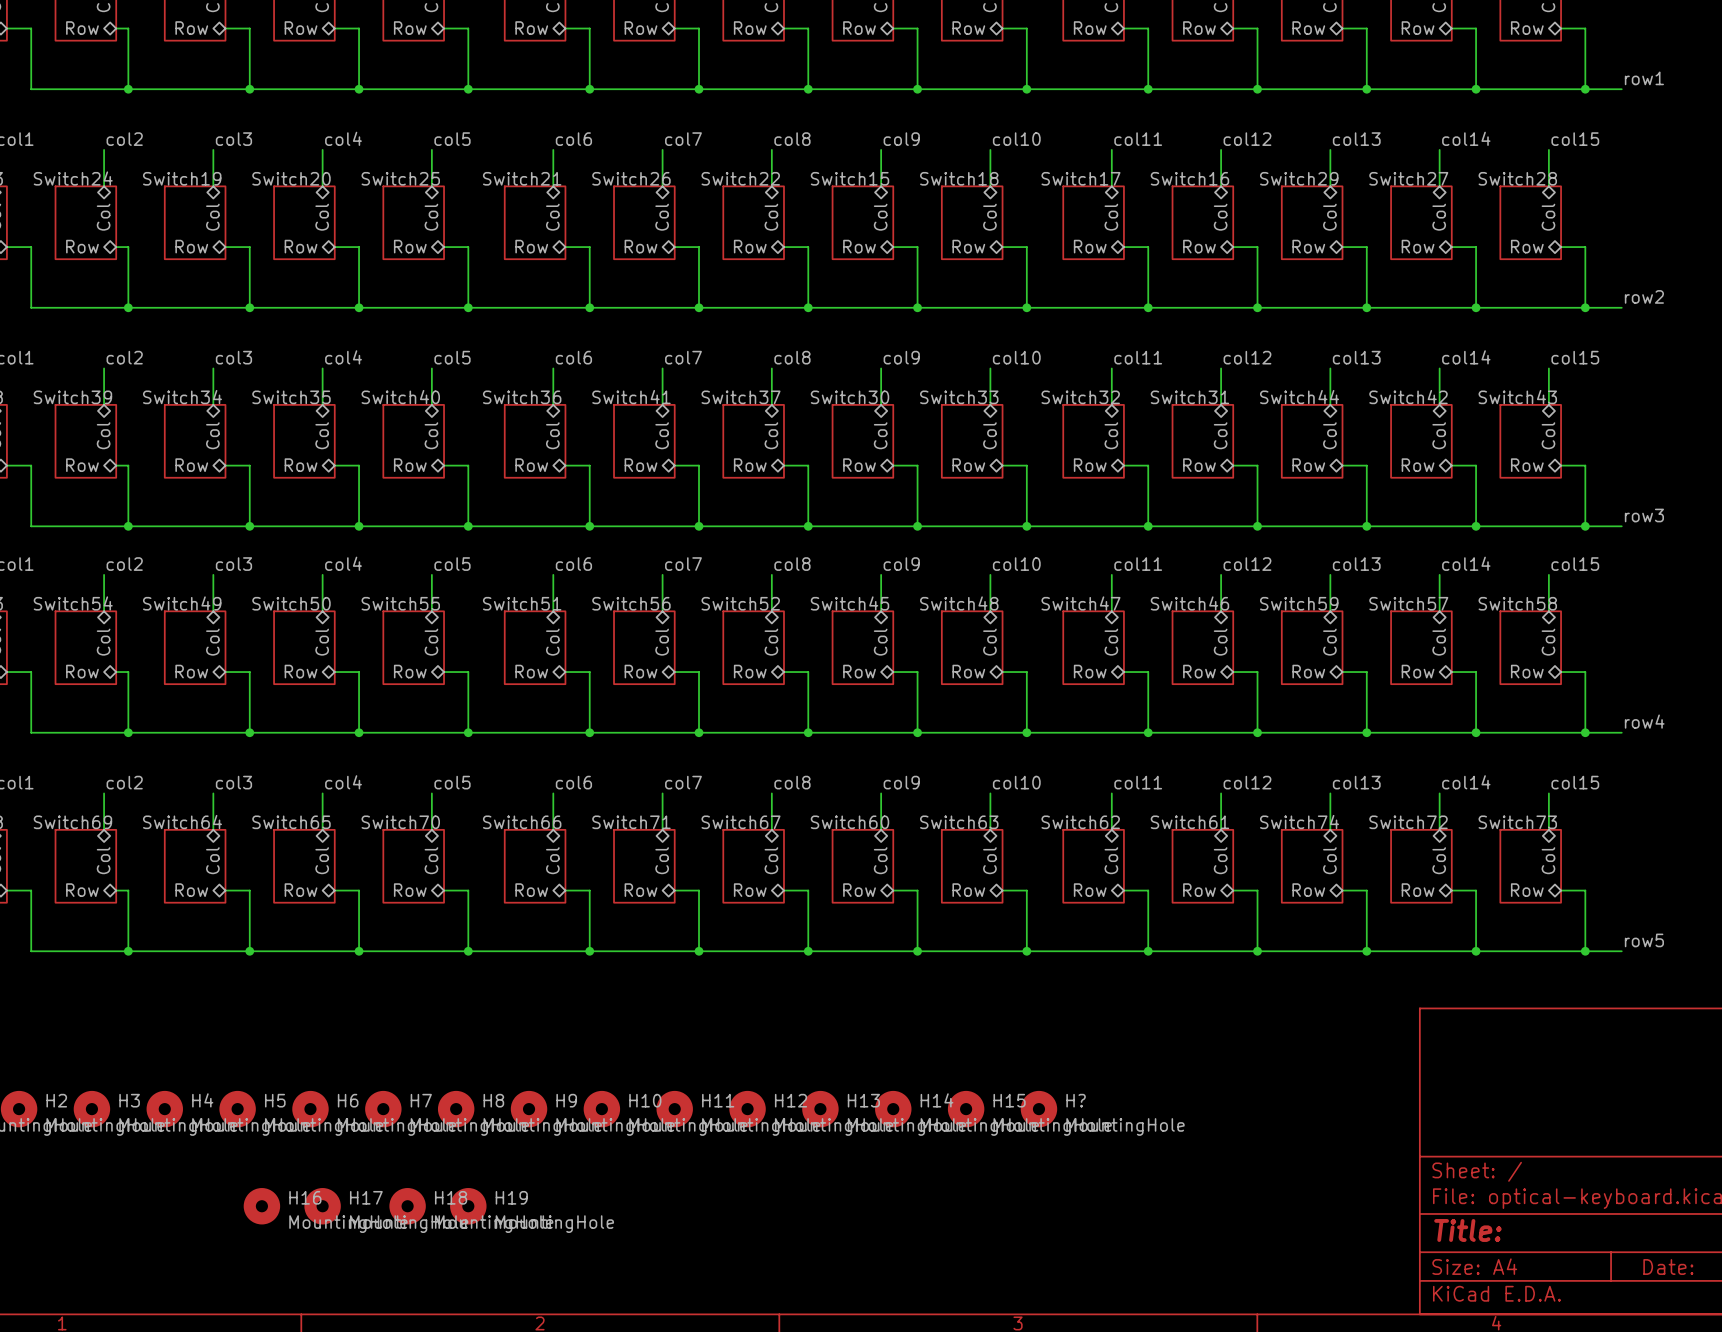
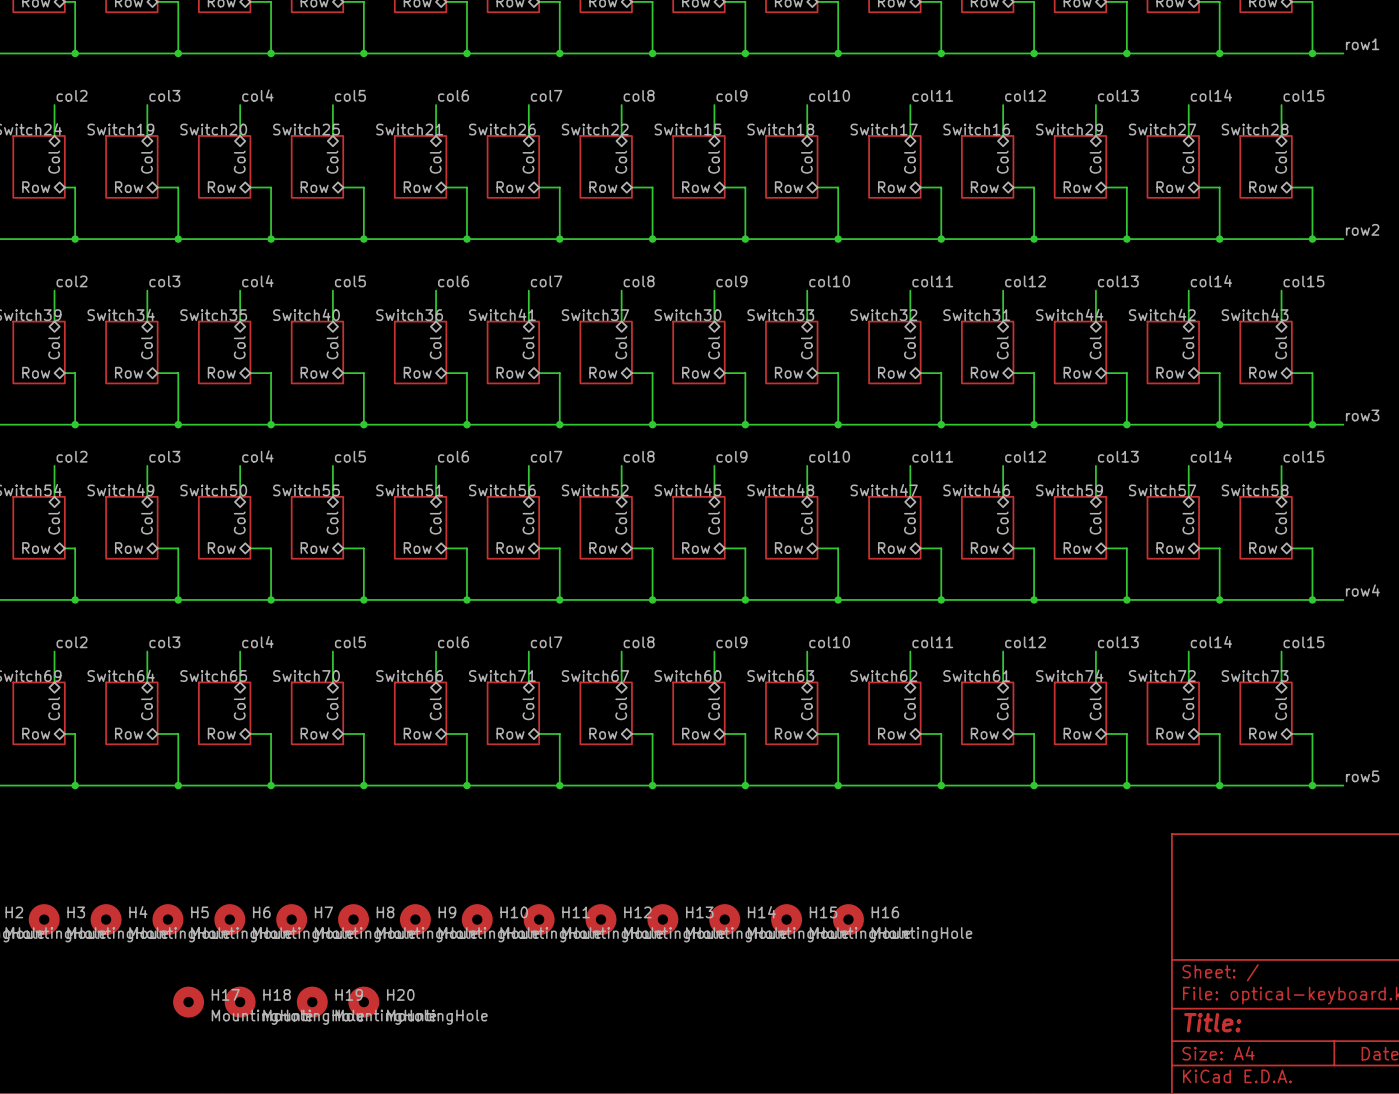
H? name: H? (1076, 1100) -> H16 (885, 912)
H16 name: H16 (305, 1197) -> H17 (225, 994)
H17 name: H17 (366, 1197) -> H18 (277, 994)
H18 name: H18 (451, 1197) -> H19 (349, 994)
H19 name: H19 (511, 1197) -> H20 (400, 994)

